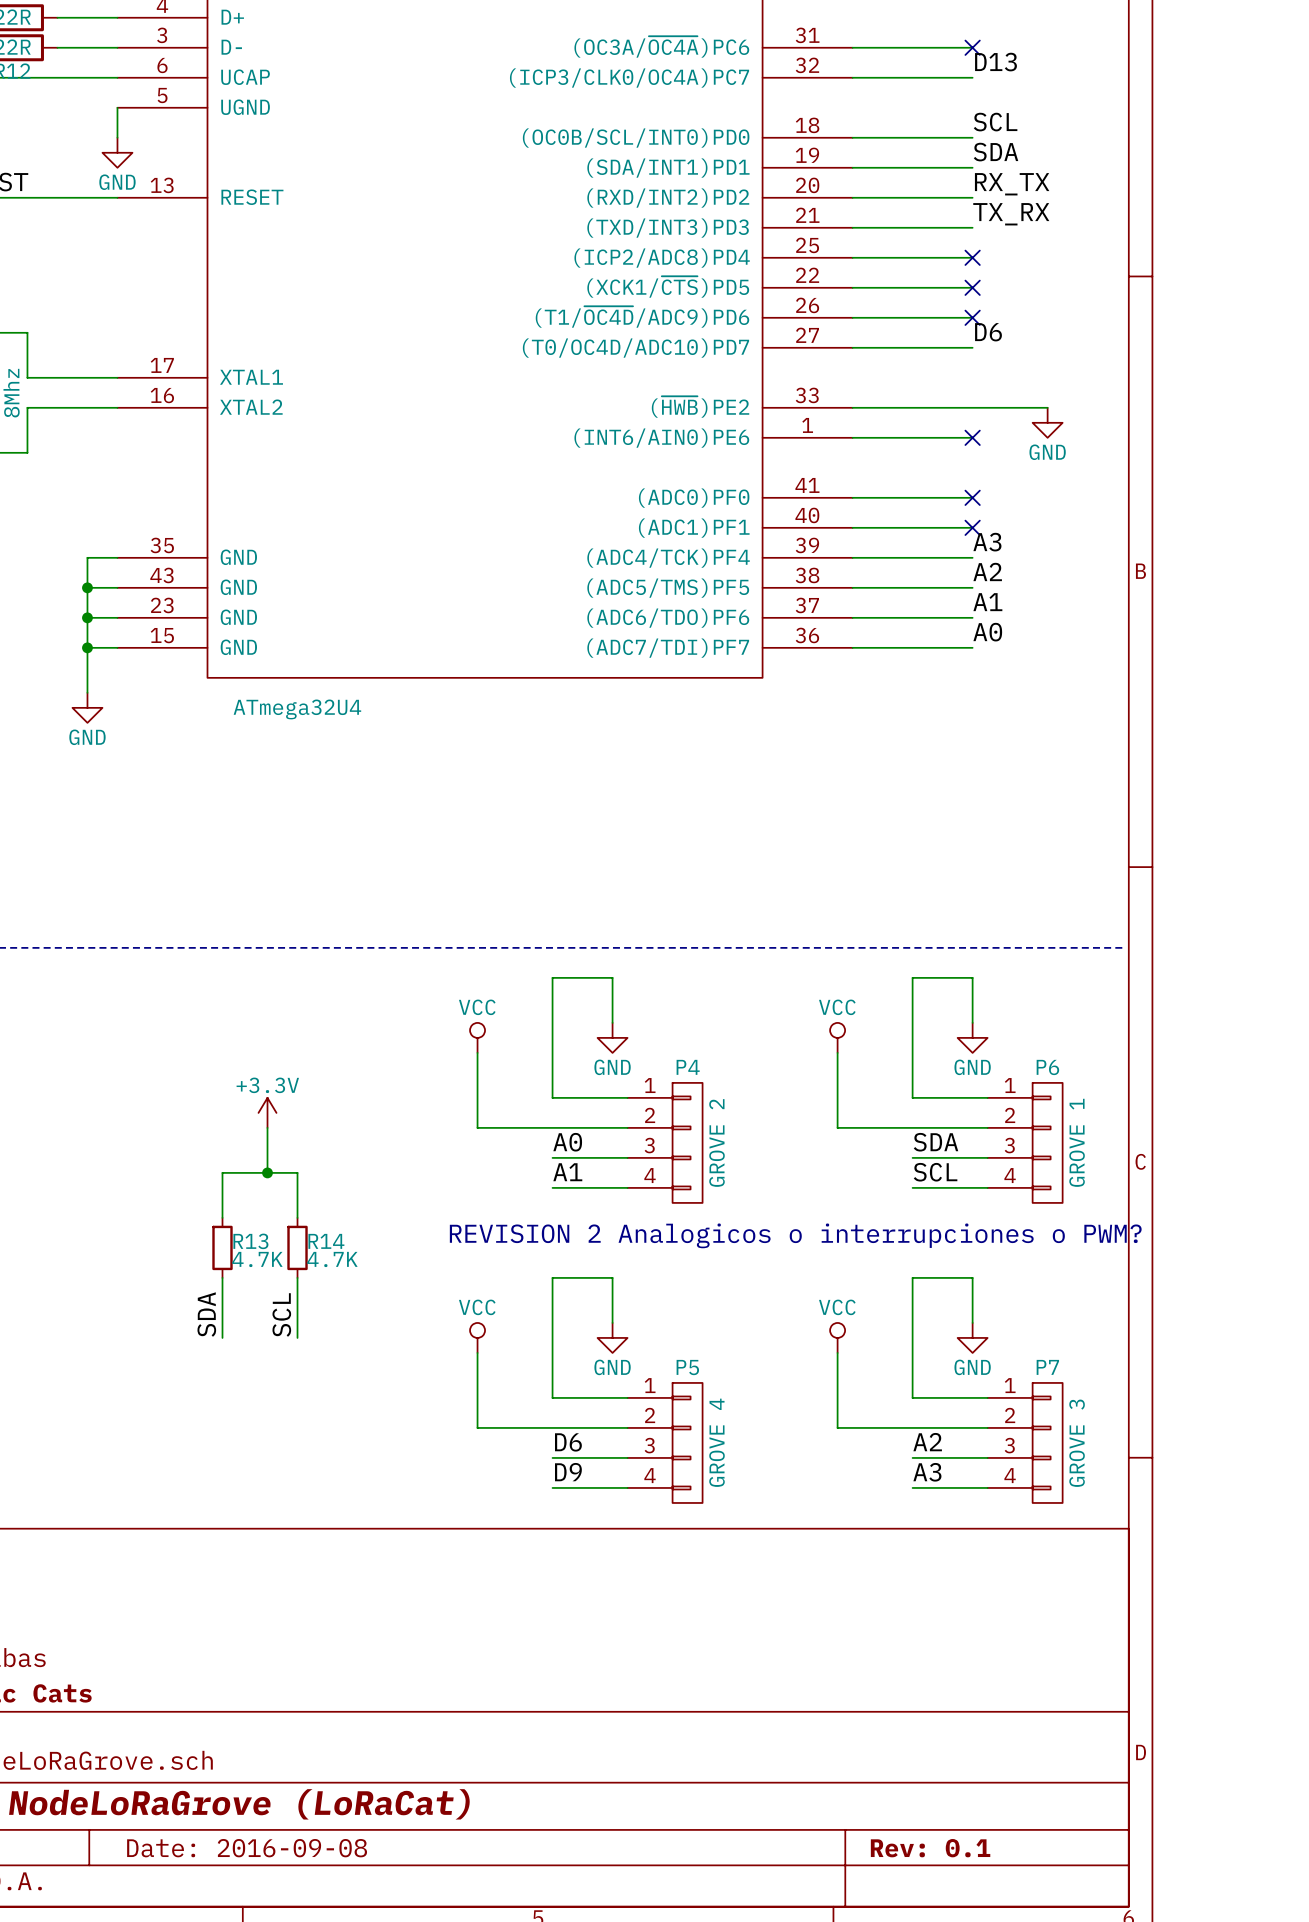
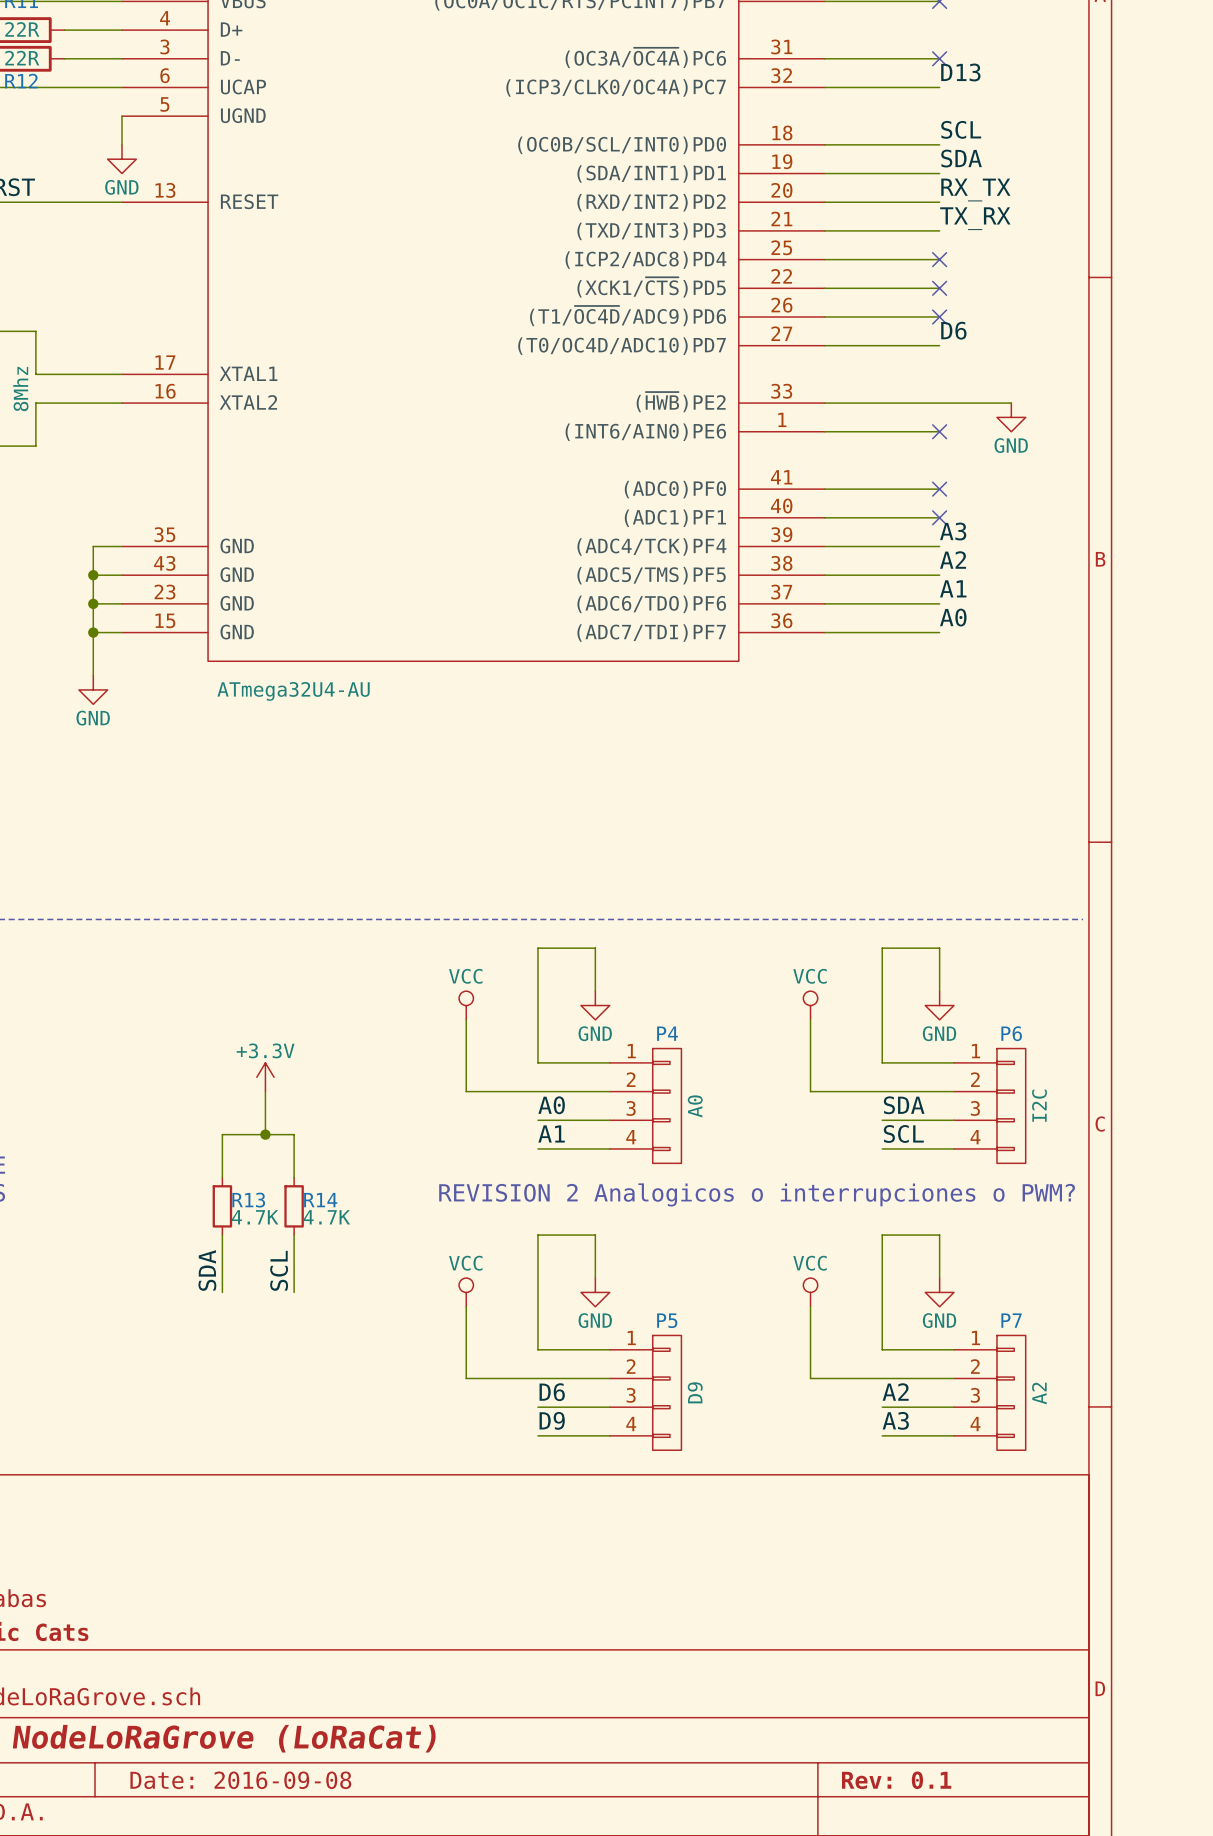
part value: ATmega32U4 (297, 709) -> ATmega32U4-AU (293, 691)
P6 value: GROVE 1 (1077, 1142) -> I2C (1039, 1105)
P4 value: GROVE 2 (717, 1143) -> A0 (695, 1106)
P5 value: GROVE 4 (717, 1442) -> D9 (695, 1392)
P7 value: GROVE 3 (1077, 1443) -> A2 (1039, 1393)

